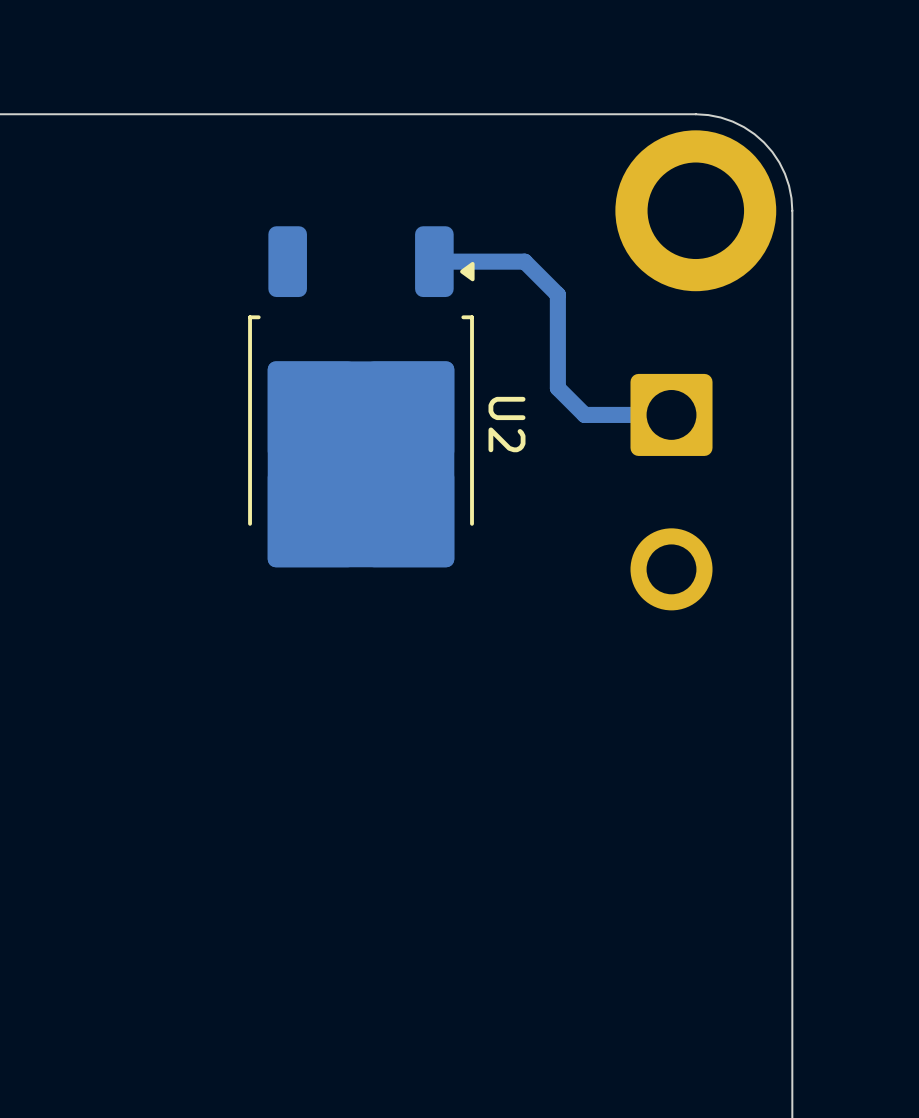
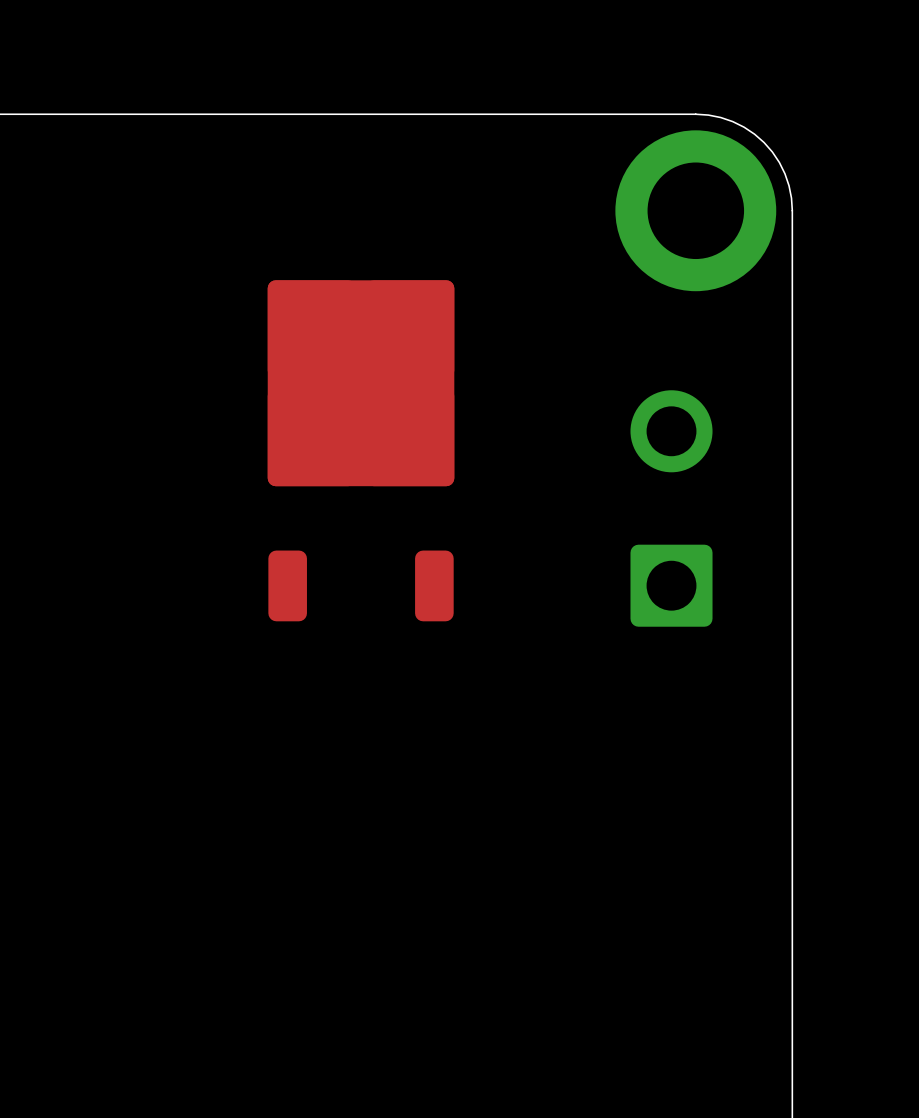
bottom track: (434, 261) (524, 261) (557, 294) (557, 388) (584, 414) (671, 414) -> none
U2 side: bottom (361, 396) -> top (361, 450)
part rotation: 0° (671, 492) -> 180° (671, 508)

